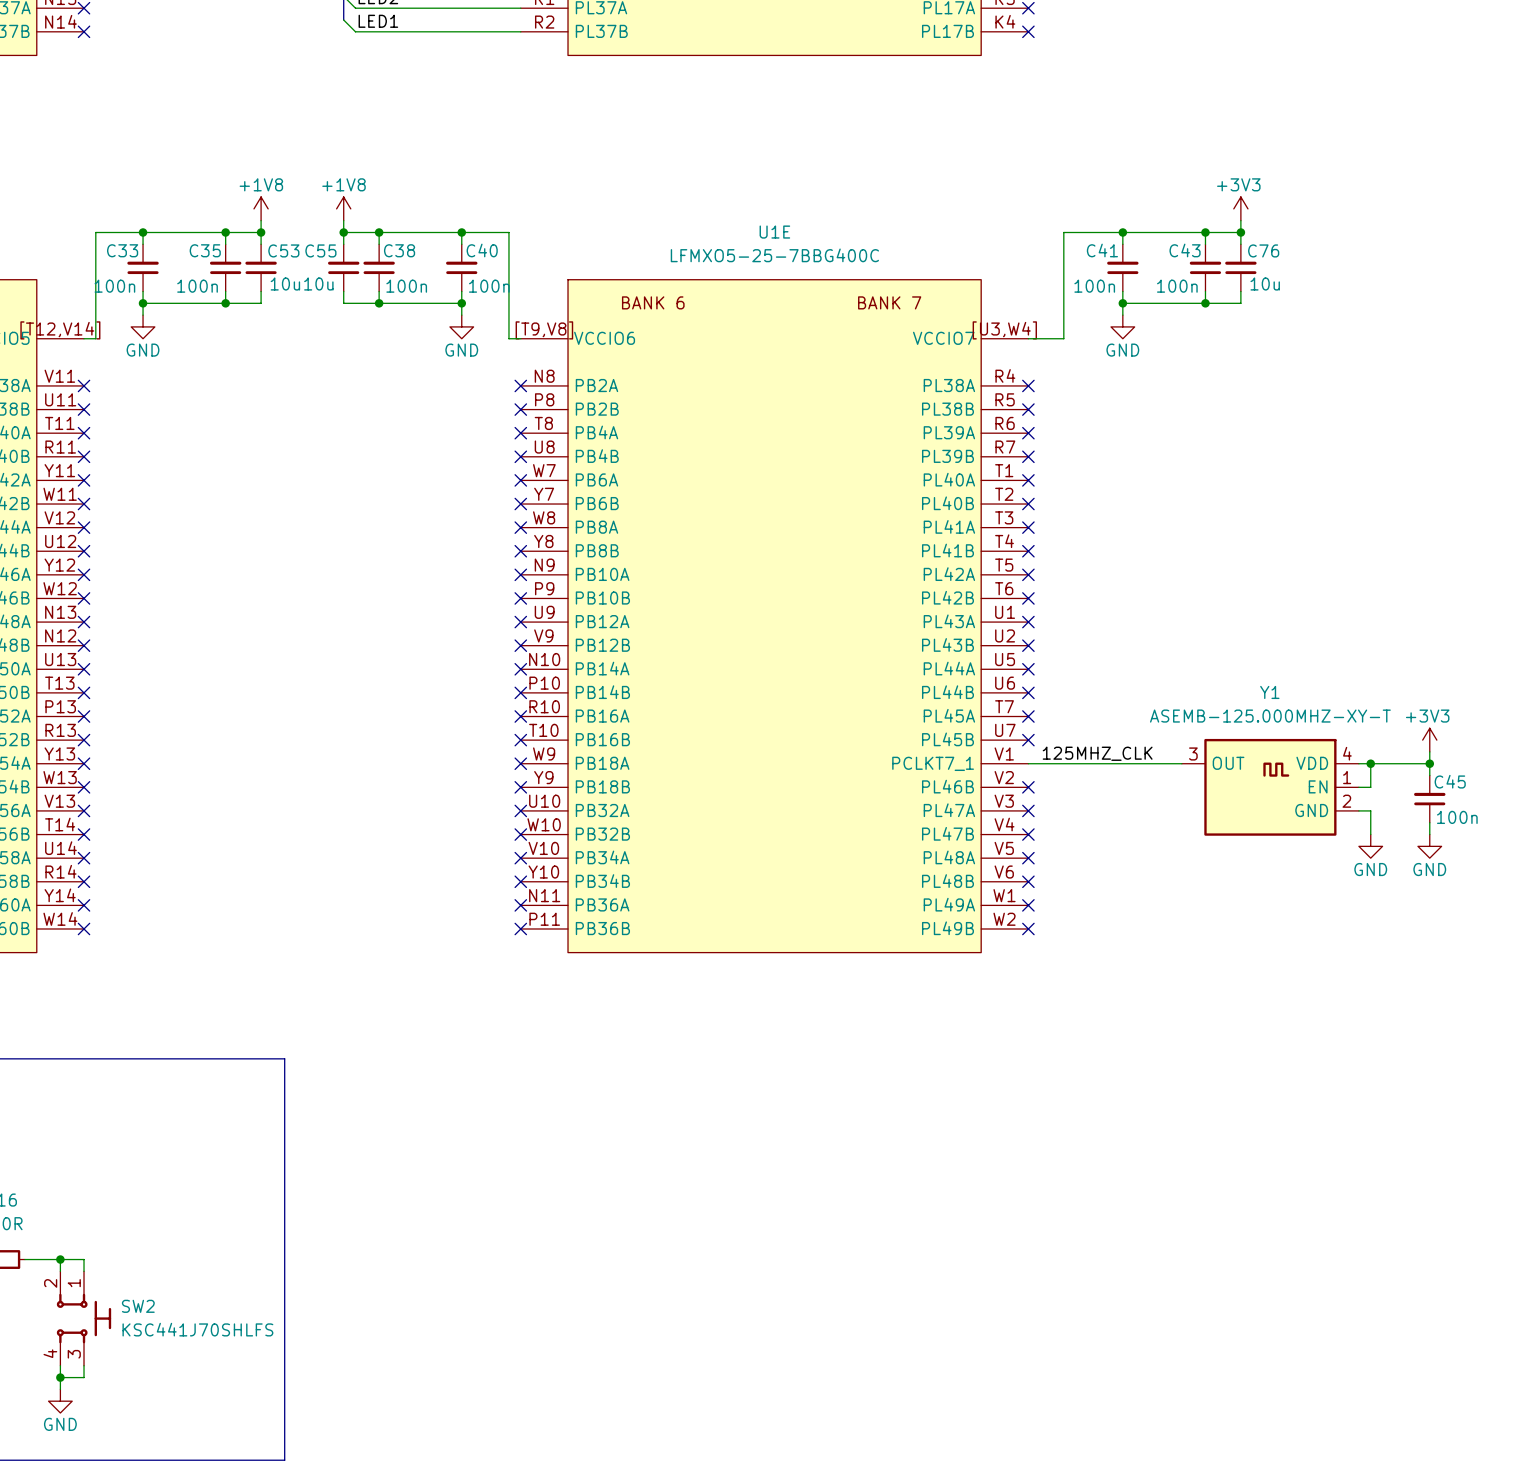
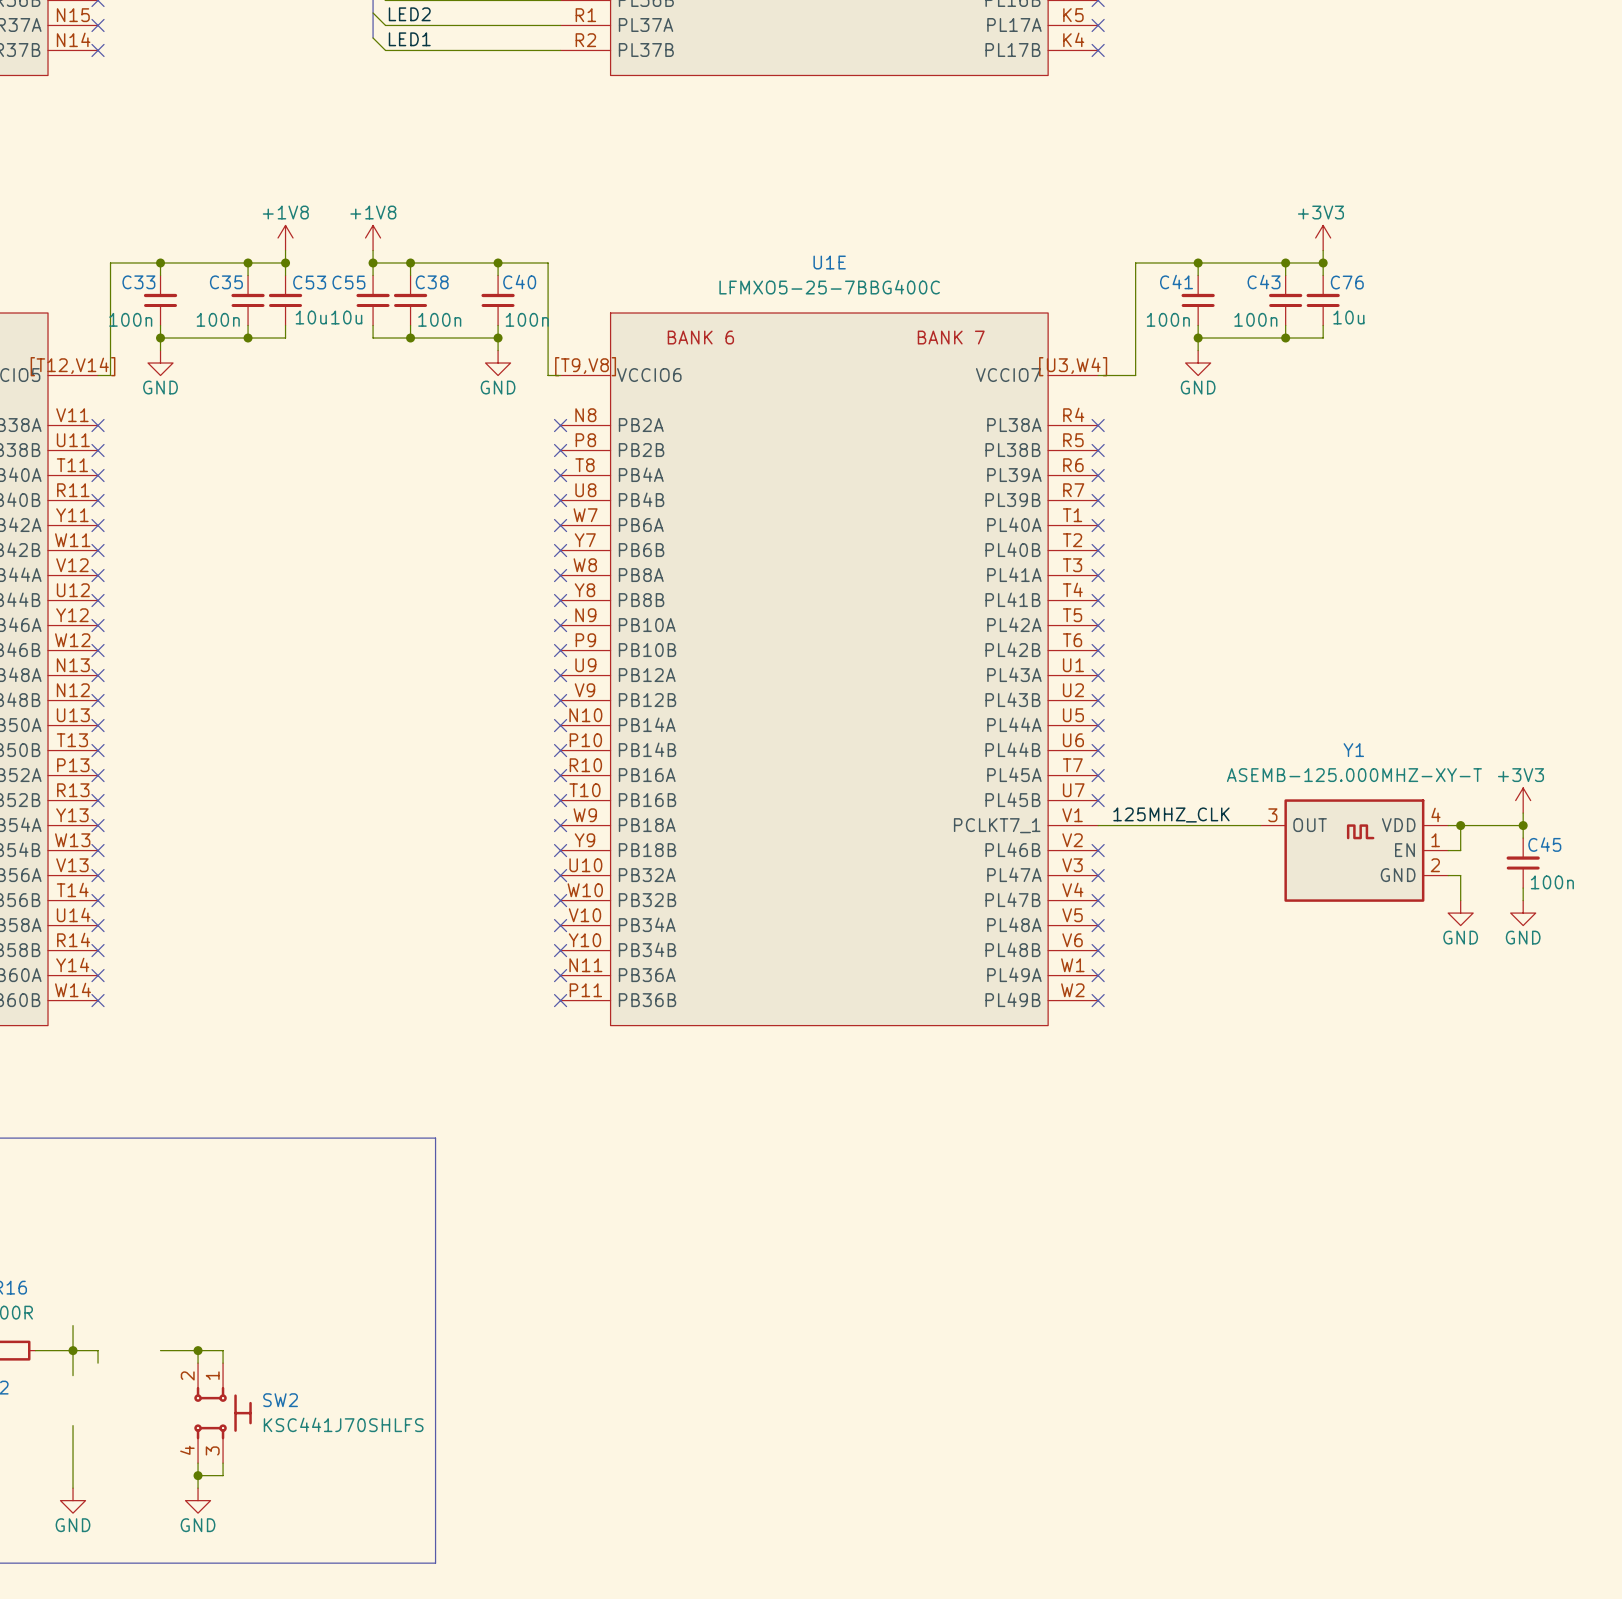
line: (284, 1058) (284, 1460) -> (310, 1138) (435, 1138) (435, 1563) (310, 1563)
wire: none -> (73, 1325) (73, 1350)
wire: none -> (160, 1350) (223, 1350) (223, 1363)
wire: none -> (198, 1350) (198, 1363)
junction: none -> (198, 1350)
SW2 position: (84, 1318) -> (223, 1413)
wire: (84, 1365) (84, 1377) (60, 1377) -> (223, 1463) (223, 1475) (198, 1475)
wire: none -> (198, 1463) (198, 1488)
junction: (60, 1377) -> none
junction: none -> (198, 1475)
power symbol: none -> GND (198, 1500)

